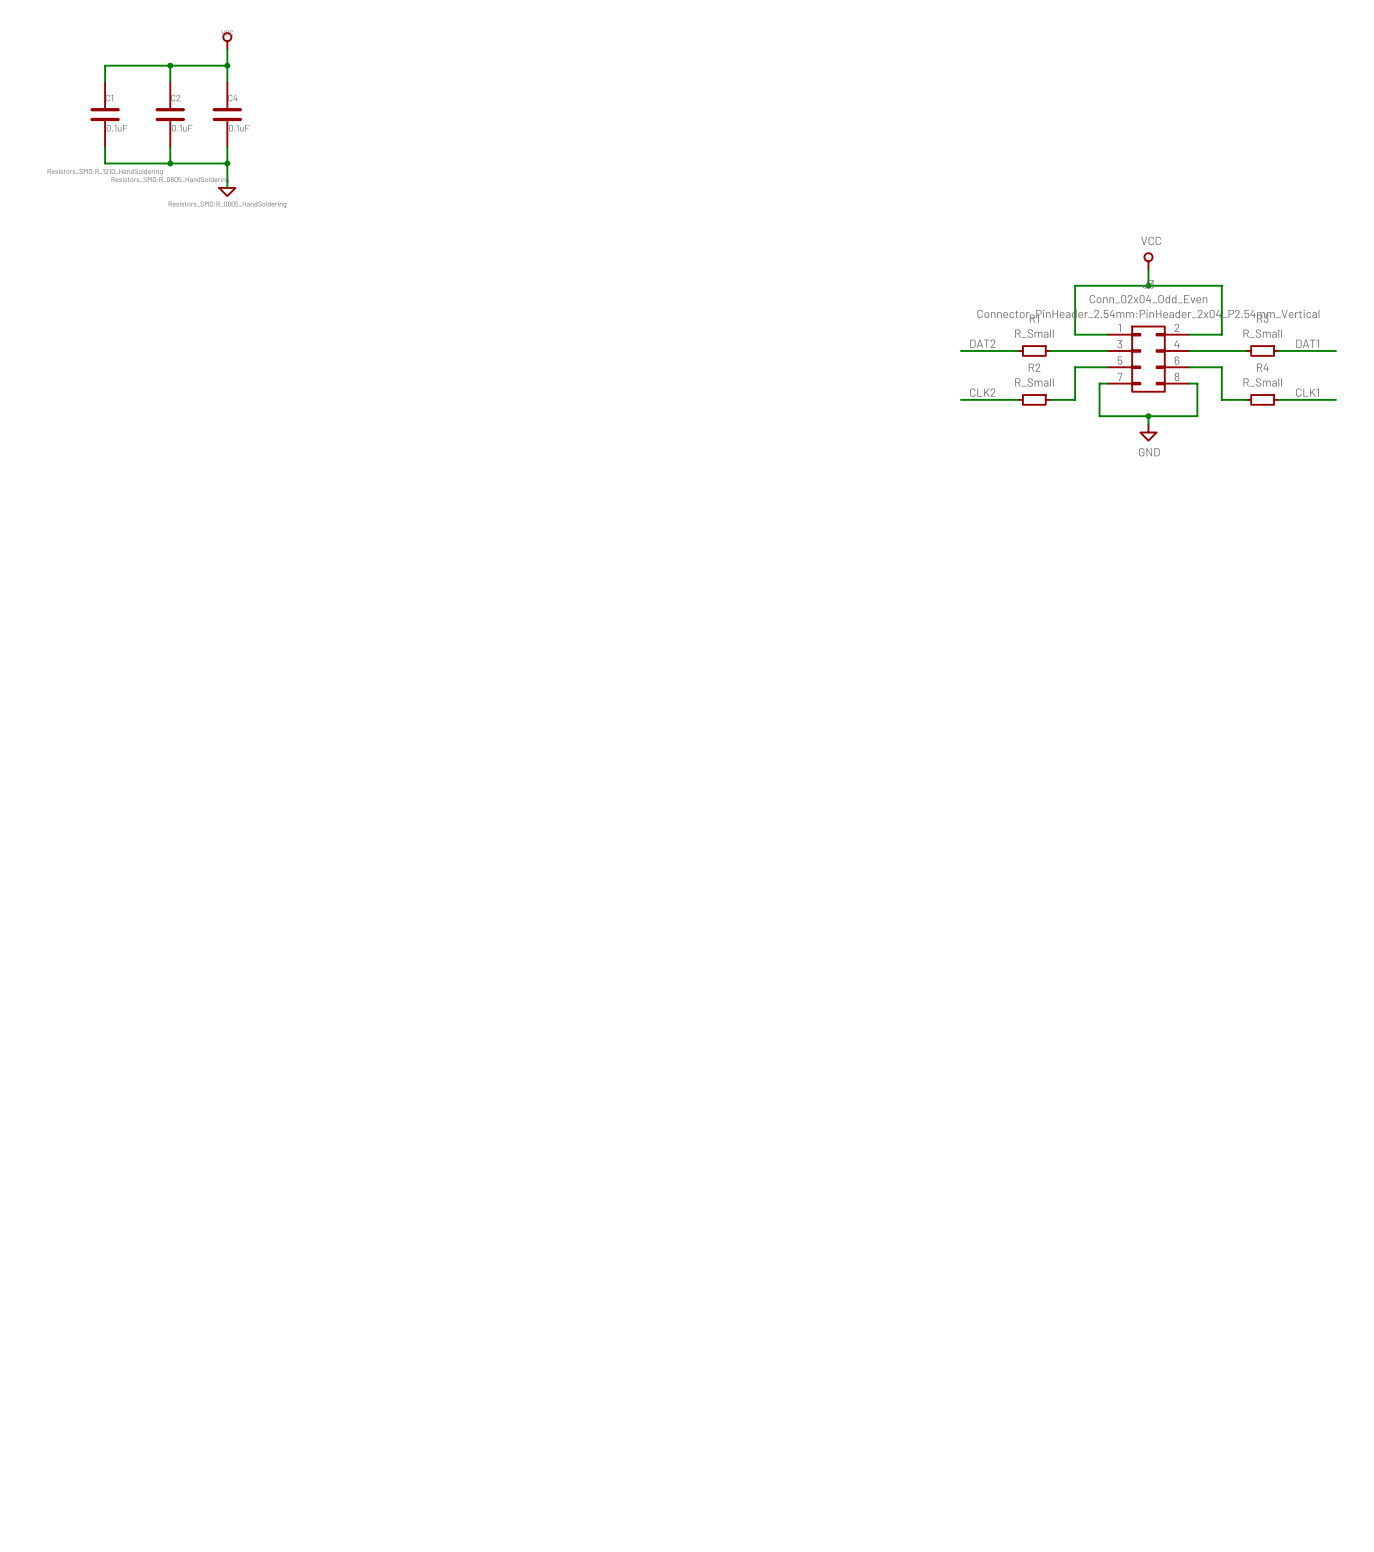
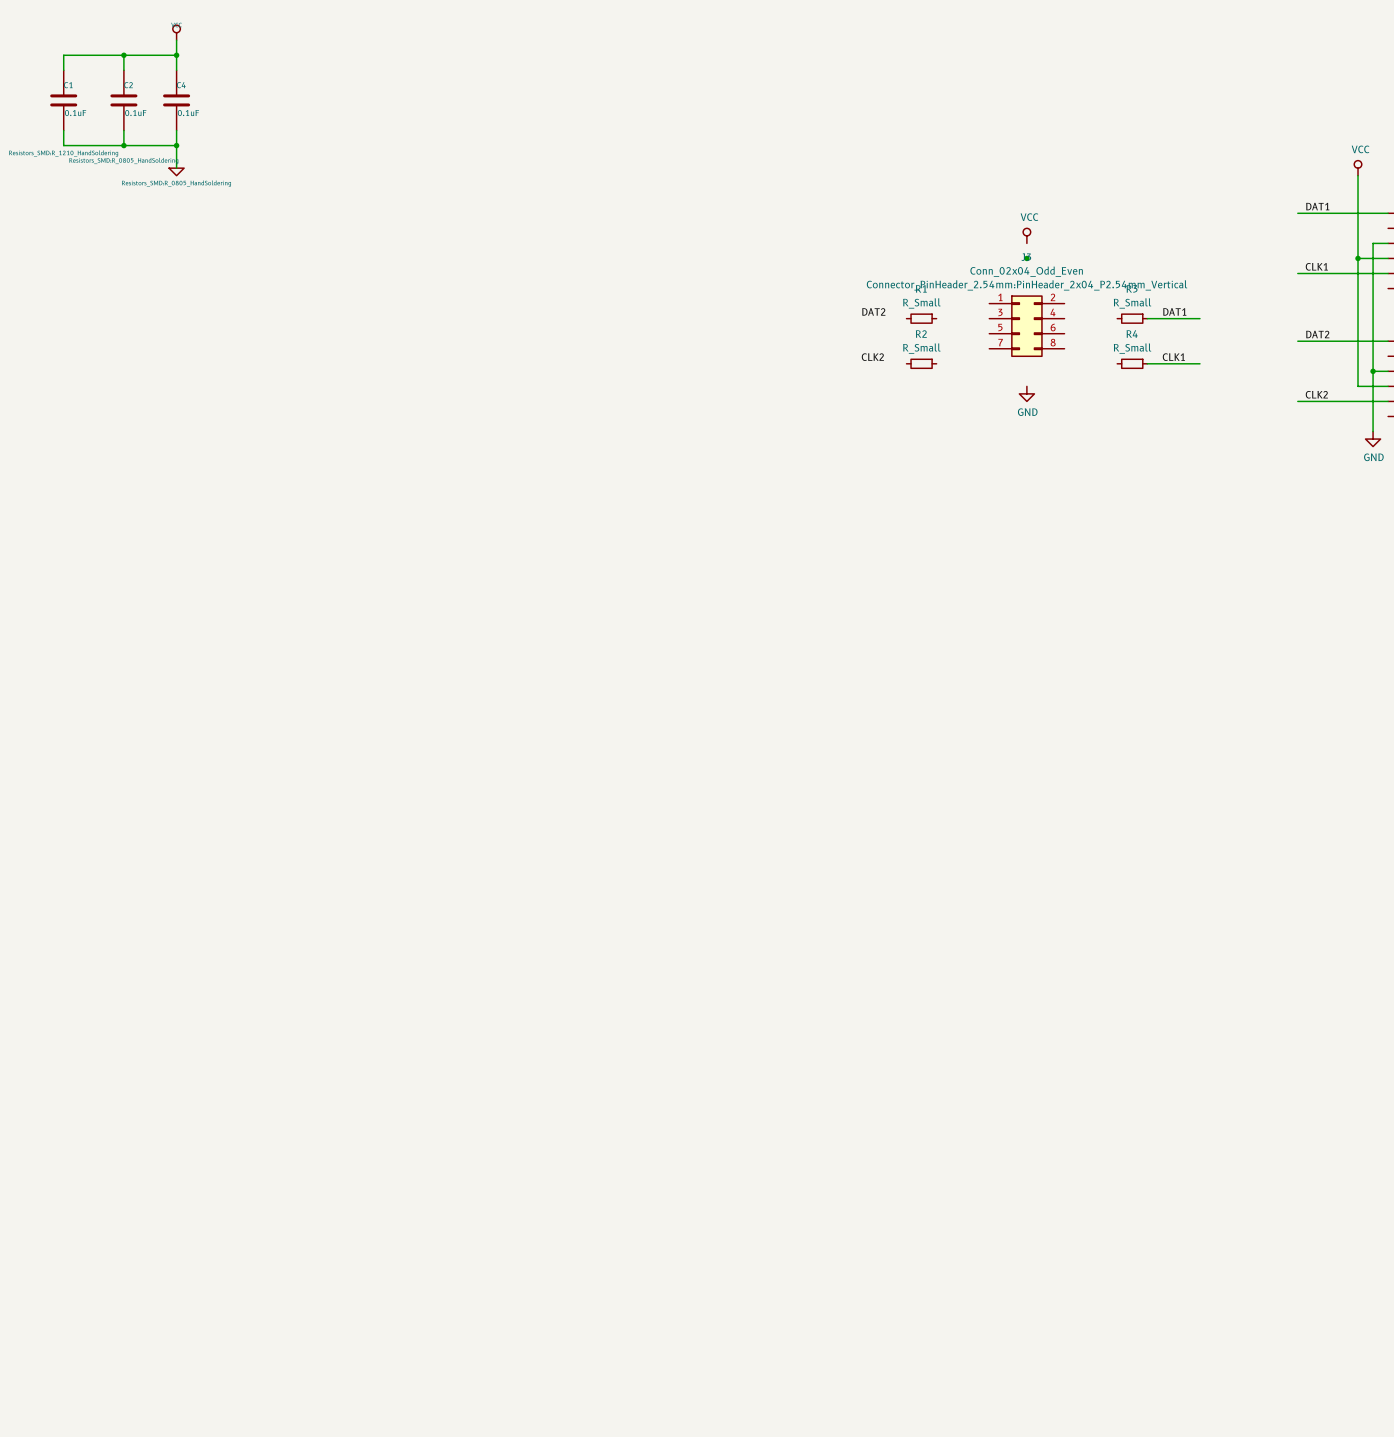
wire: (1148, 269) (1148, 285) -> none
wire: (1107, 334) (1075, 334) (1075, 285) (1221, 285) (1221, 334) (1189, 334) -> none
wire: (960, 350) (1018, 350) -> none
wire: (1050, 350) (1107, 350) -> none
wire: (1189, 350) (1246, 350) -> none
wire: (1107, 367) (1075, 367) (1075, 399) (1050, 399) -> none
wire: (1189, 367) (1221, 367) (1221, 399) (1246, 399) -> none
wire: (1107, 383) (1099, 383) (1099, 416) (1197, 416) (1197, 383) (1189, 383) -> none
wire: (960, 399) (1018, 399) -> none
wire: (1148, 416) (1148, 424) -> none
junction: (1148, 416) -> none

